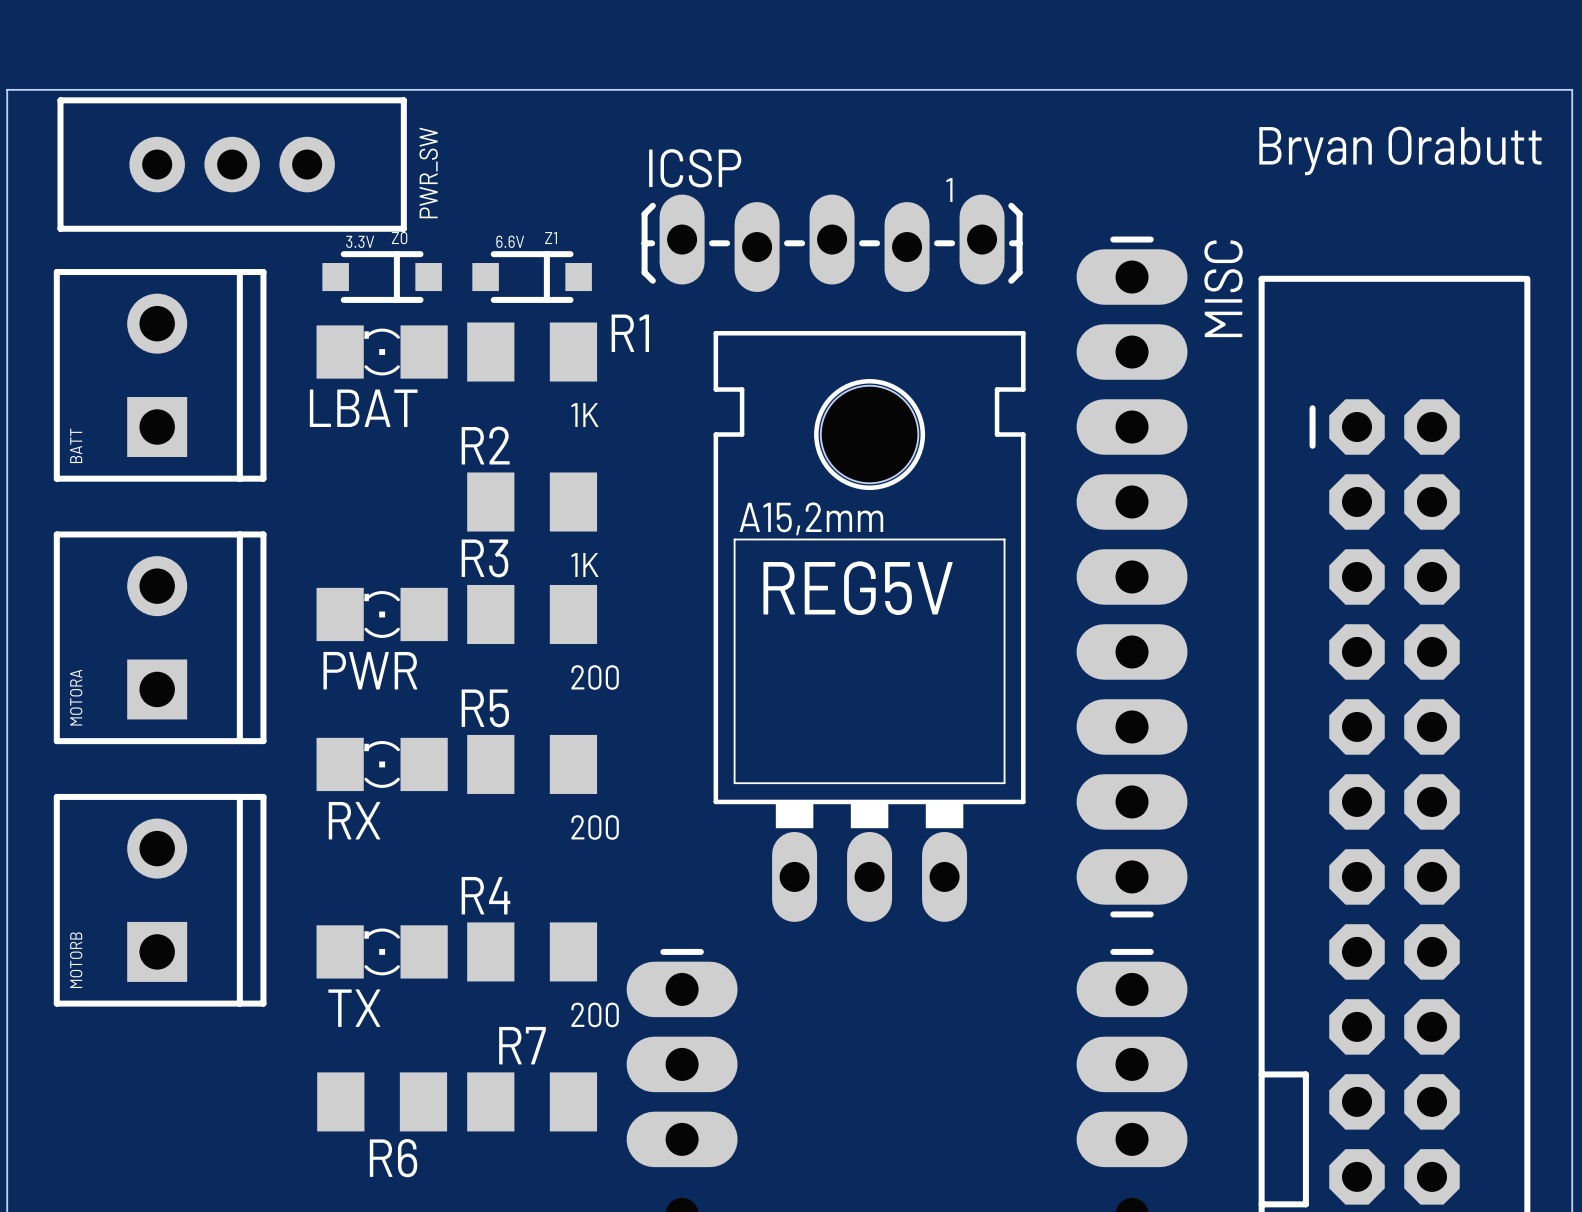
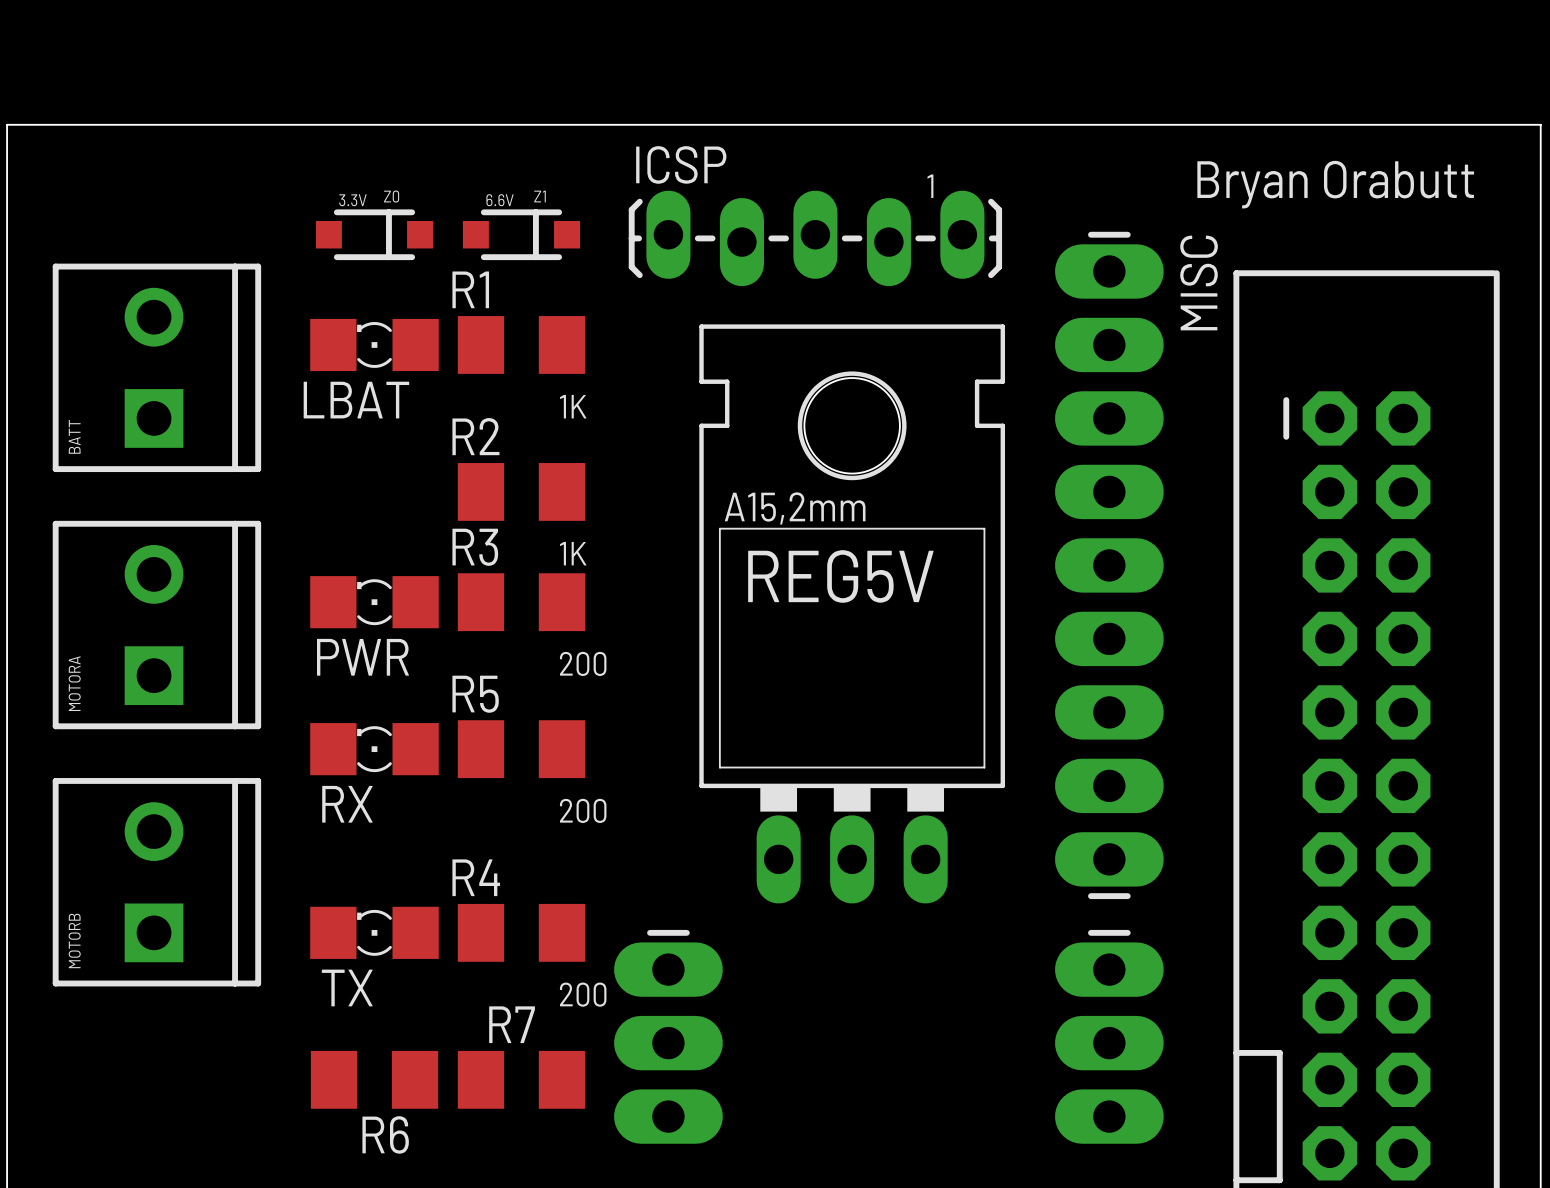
board edge: (7, 127) (7, 89) (1572, 89) (1572, 127) -> (7, 124) (1540, 124)
text position: Bryan Orabutt (1400, 150) -> Bryan Orabutt (1335, 184)
PWR_SW: (232, 164) -> none
Z0 position: (382, 277) -> (374, 234)
Z1 position: (532, 277) -> (521, 234)
R1 name position: R1 (630, 333) -> R1 (470, 289)

